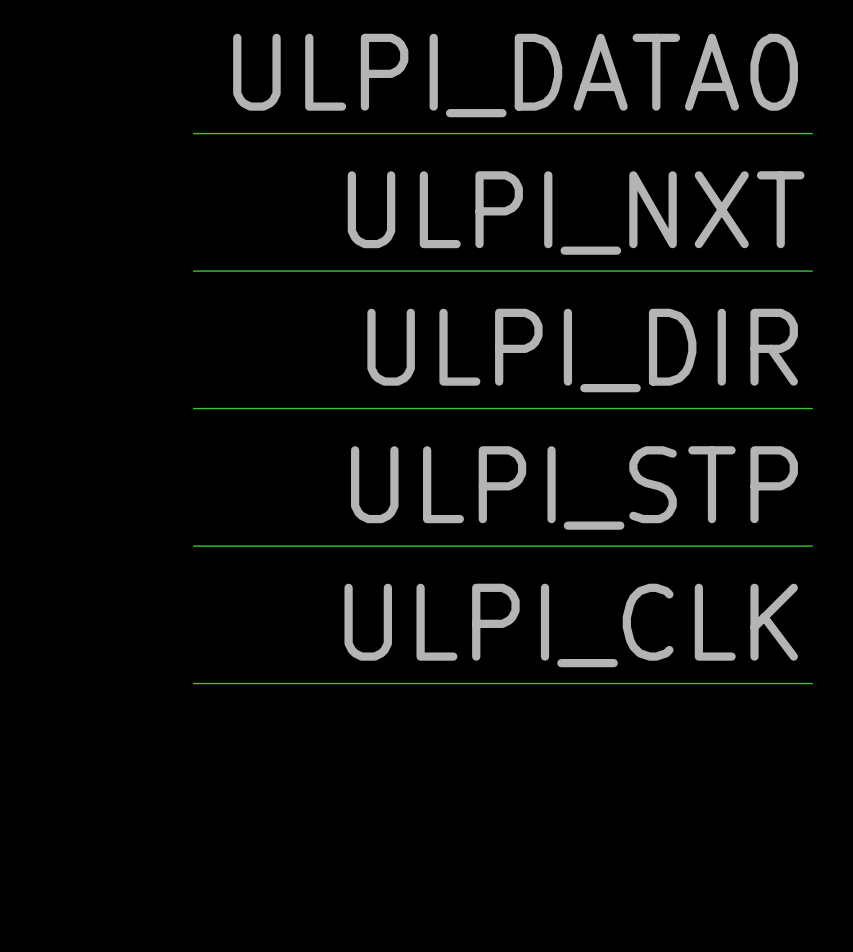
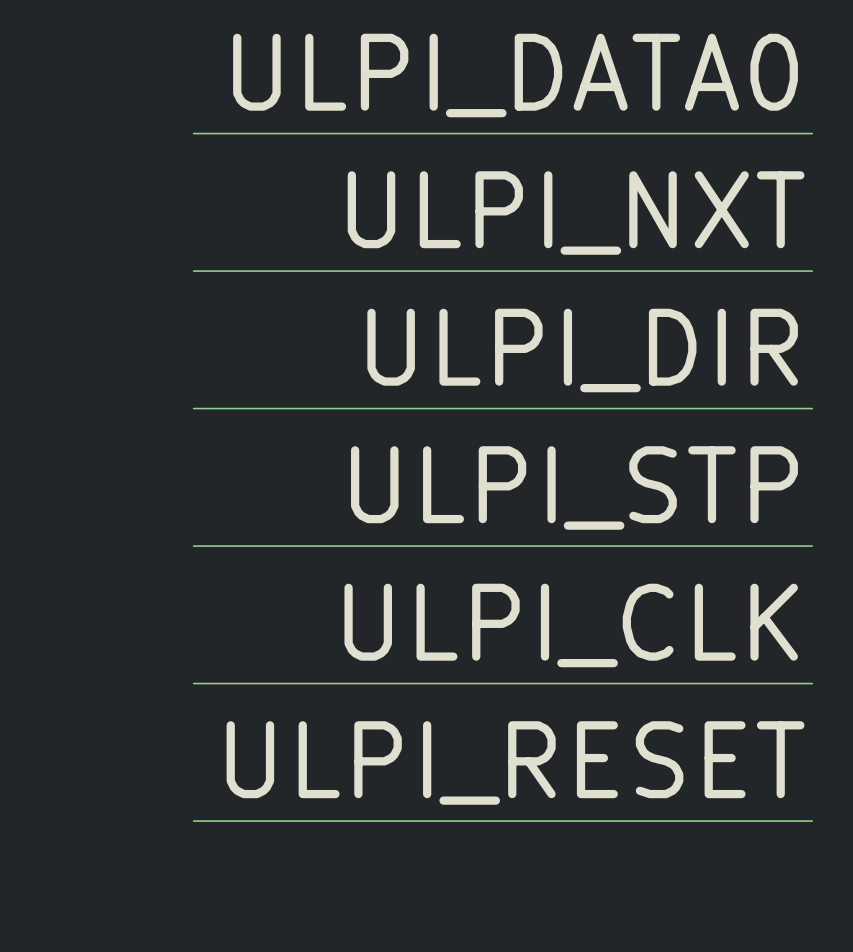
label: none -> ULPI_RESET (515, 762)
wire: none -> (193, 821) (812, 821)

